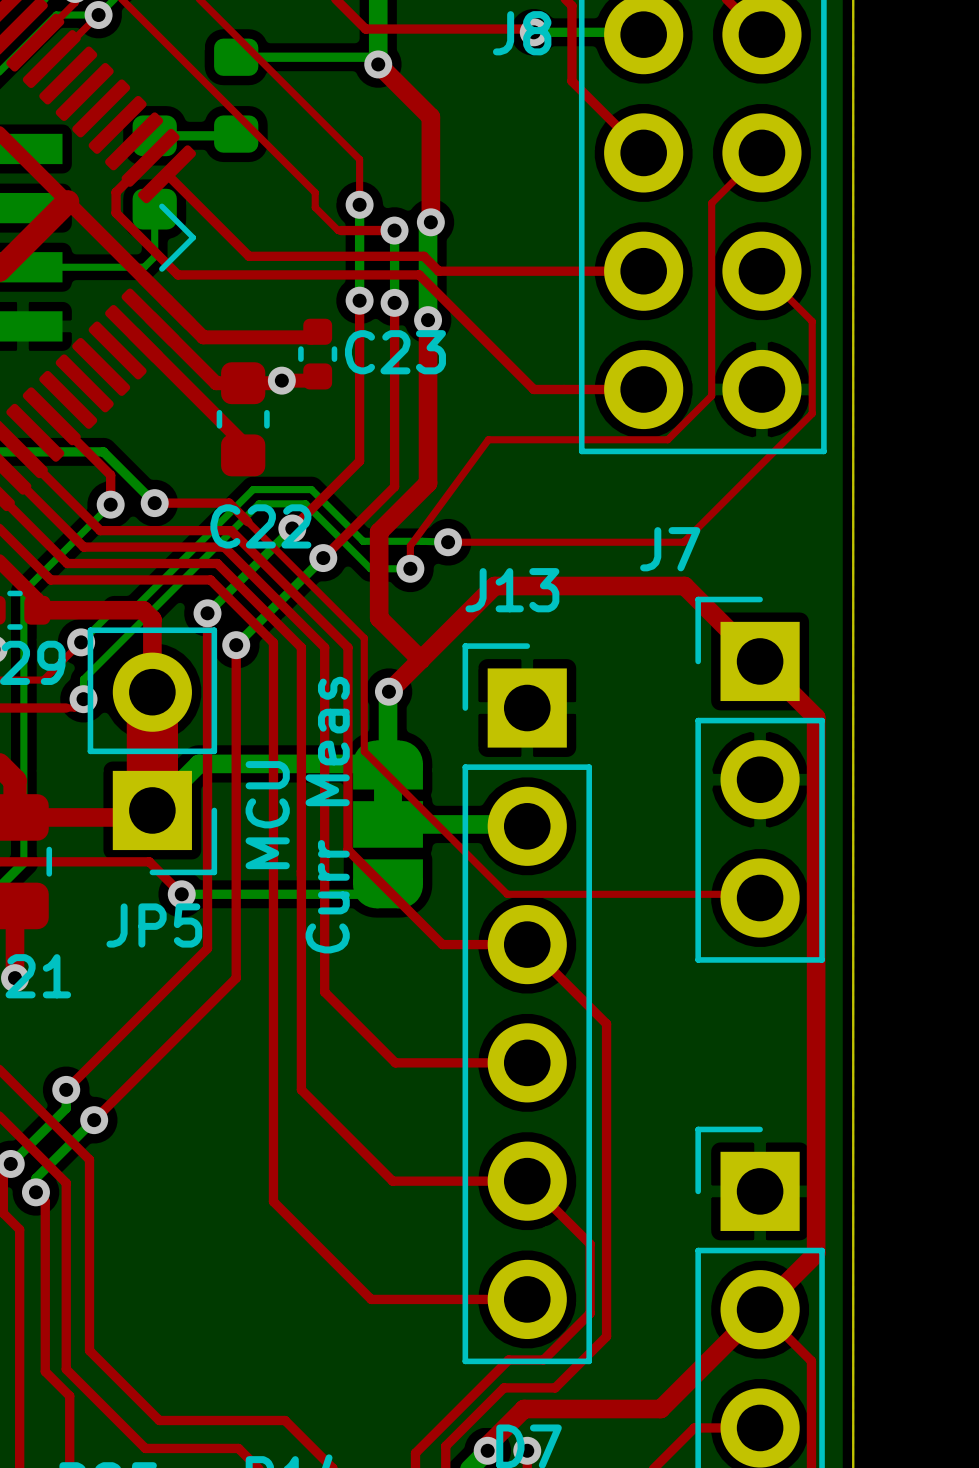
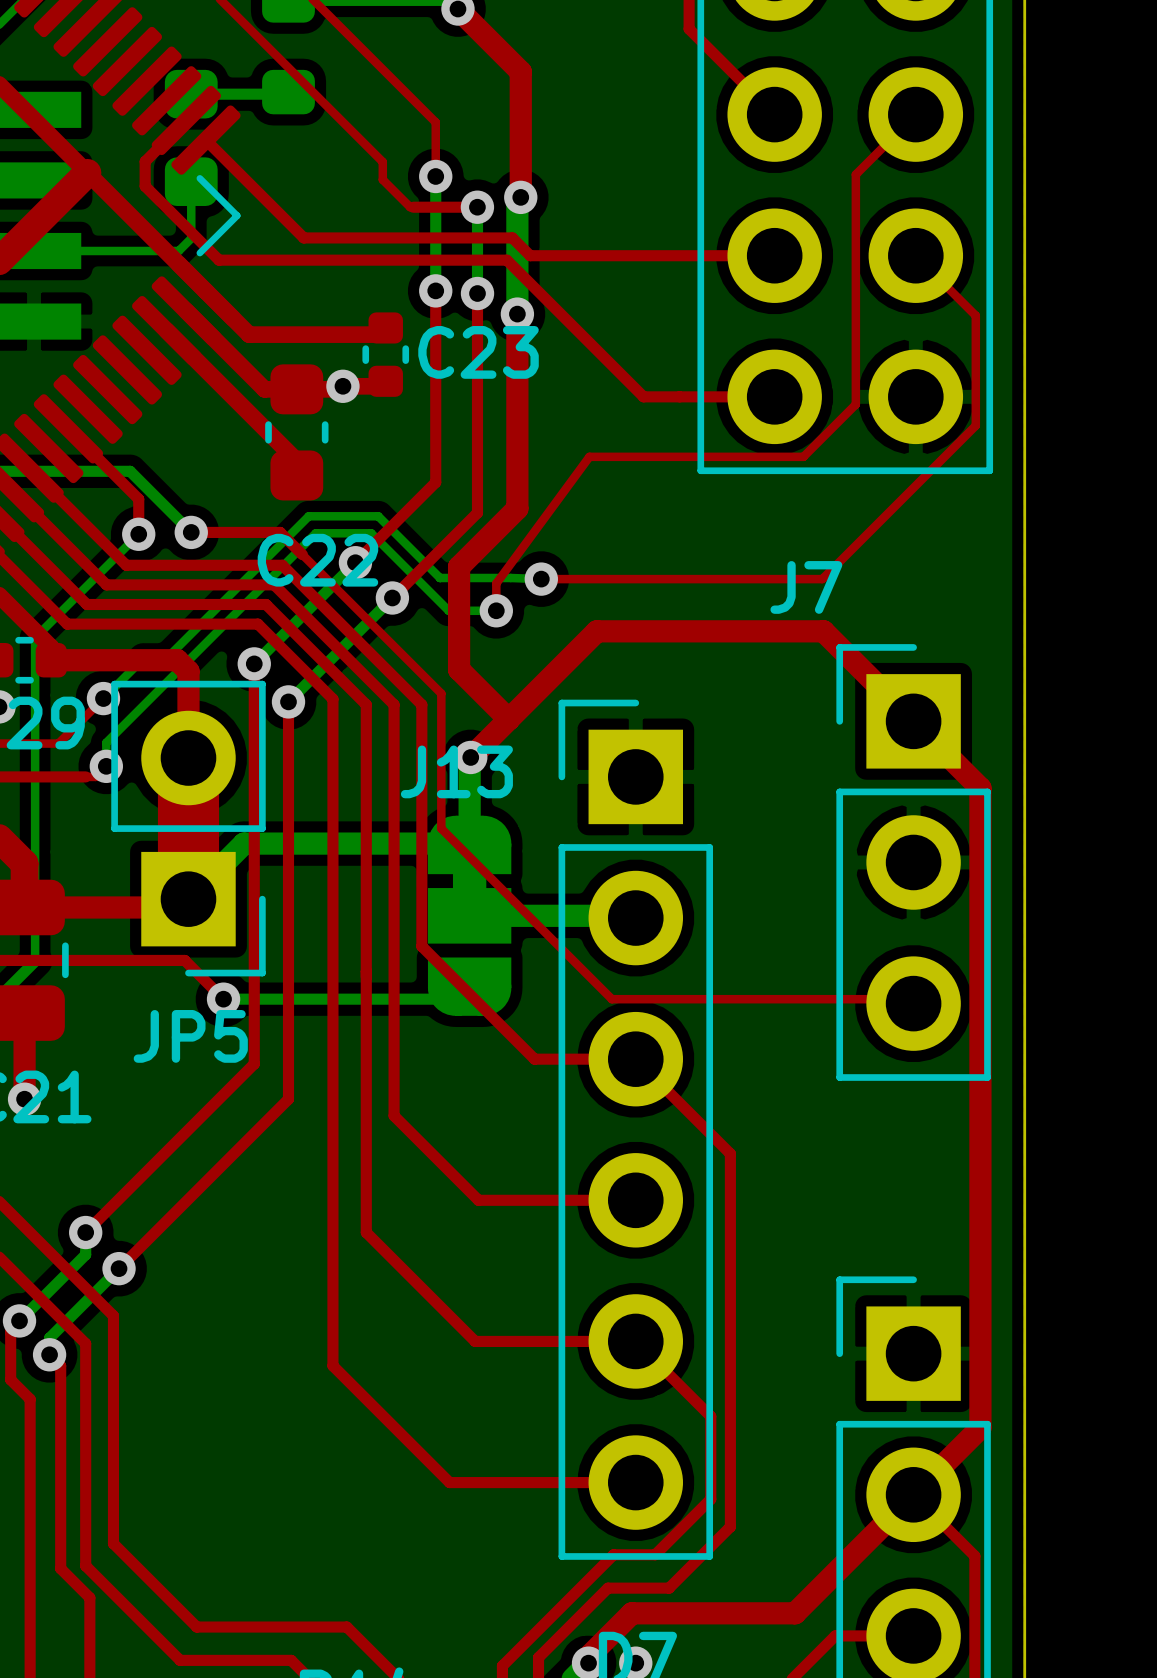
J13 name position: J13 (512, 590) -> J13 (456, 771)
text: MCU (267, 815) -> none
text: Curr Meas (327, 815) -> none

